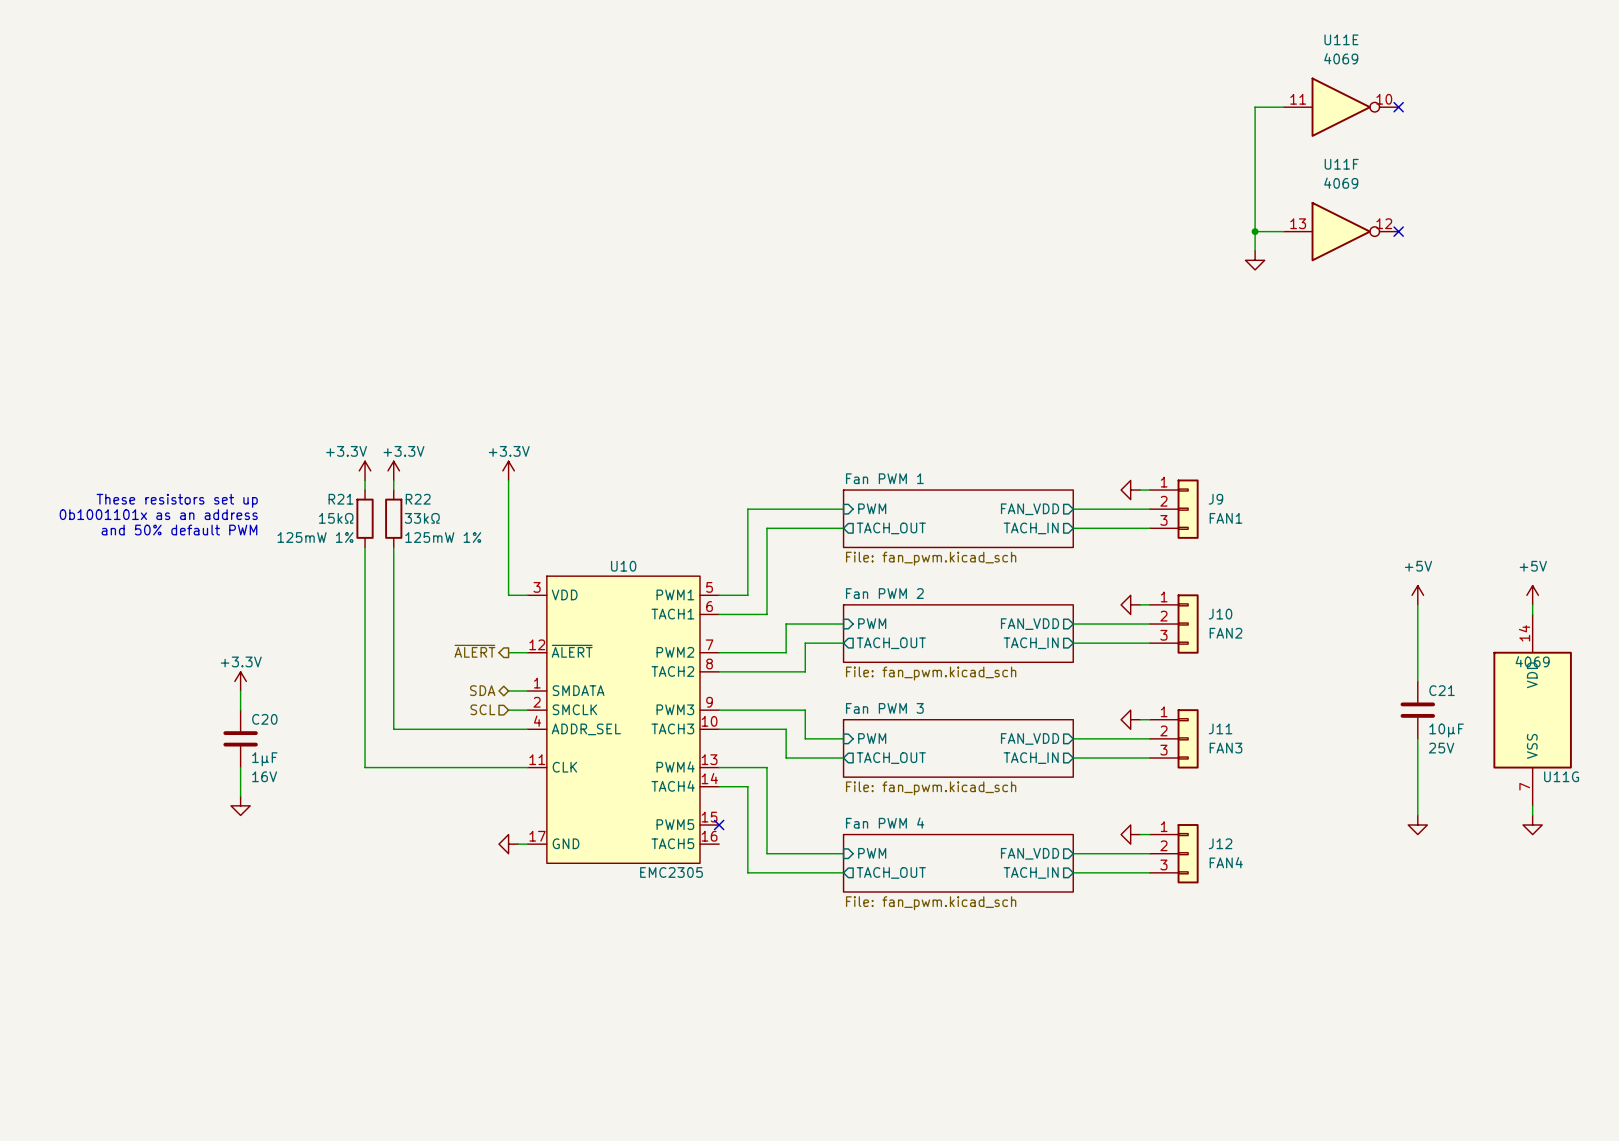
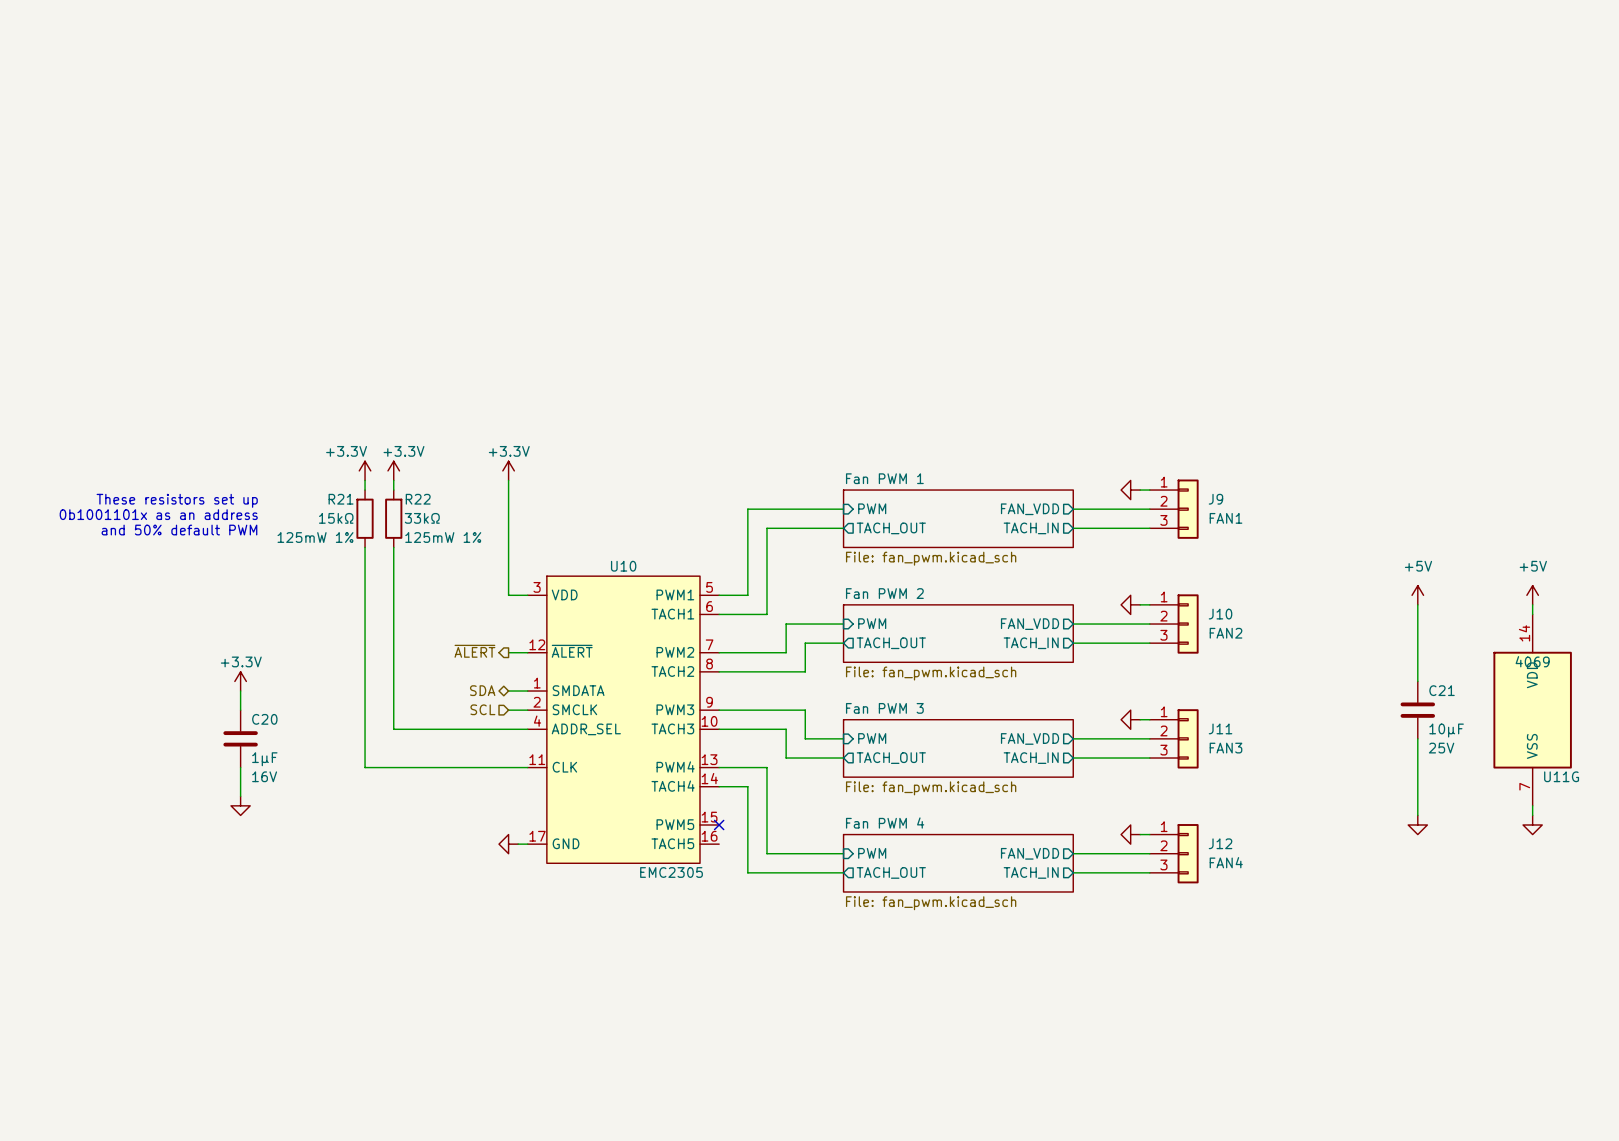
wire: (1283, 107) (1255, 107) (1255, 250) -> none
U11E: 4069 (1341, 107) -> none
no-connect mark: (1398, 107) -> none
wire: (1255, 231) (1283, 231) -> none
junction: (1255, 231) -> none
U11F: 4069 (1341, 231) -> none
no-connect mark: (1398, 231) -> none
power symbol: (1255, 260) -> none

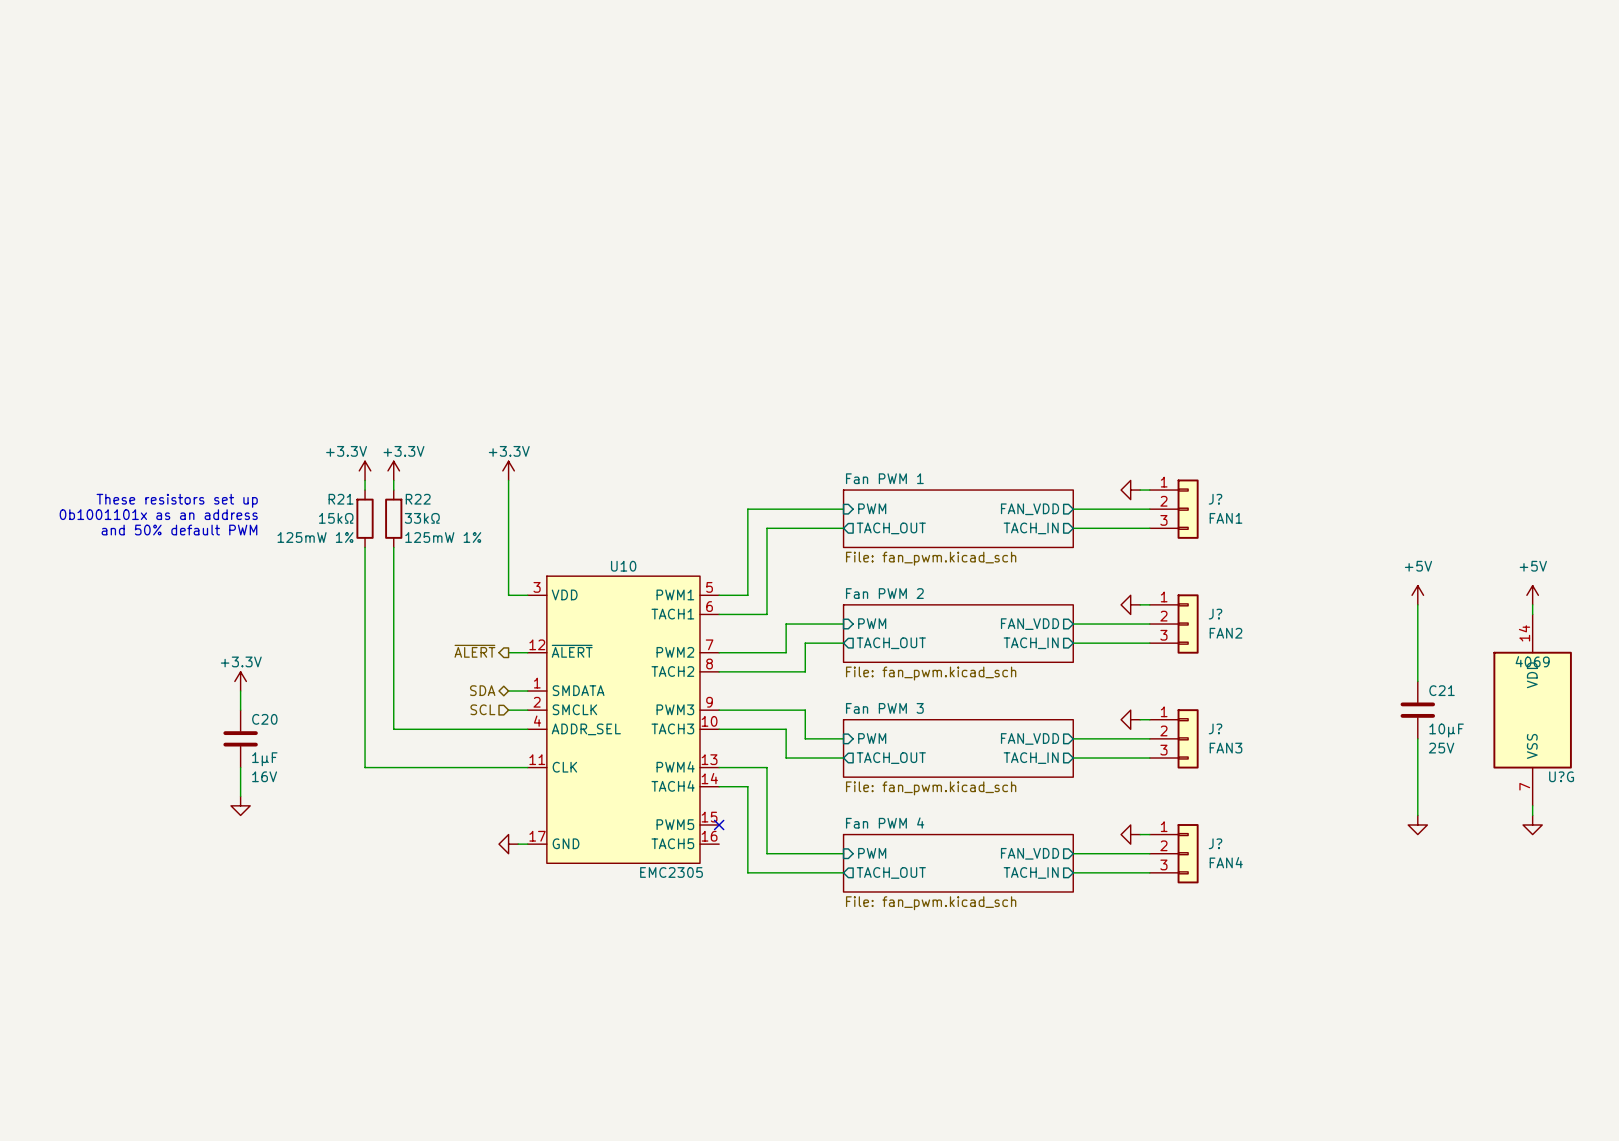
J9 name: J9 (1215, 499) -> J? (1215, 499)
J10 name: J10 (1220, 614) -> J? (1215, 614)
J11 name: J11 (1220, 728) -> J? (1215, 728)
U11G name: U11G (1561, 776) -> U?G (1561, 776)
J12 name: J12 (1220, 843) -> J? (1215, 843)

